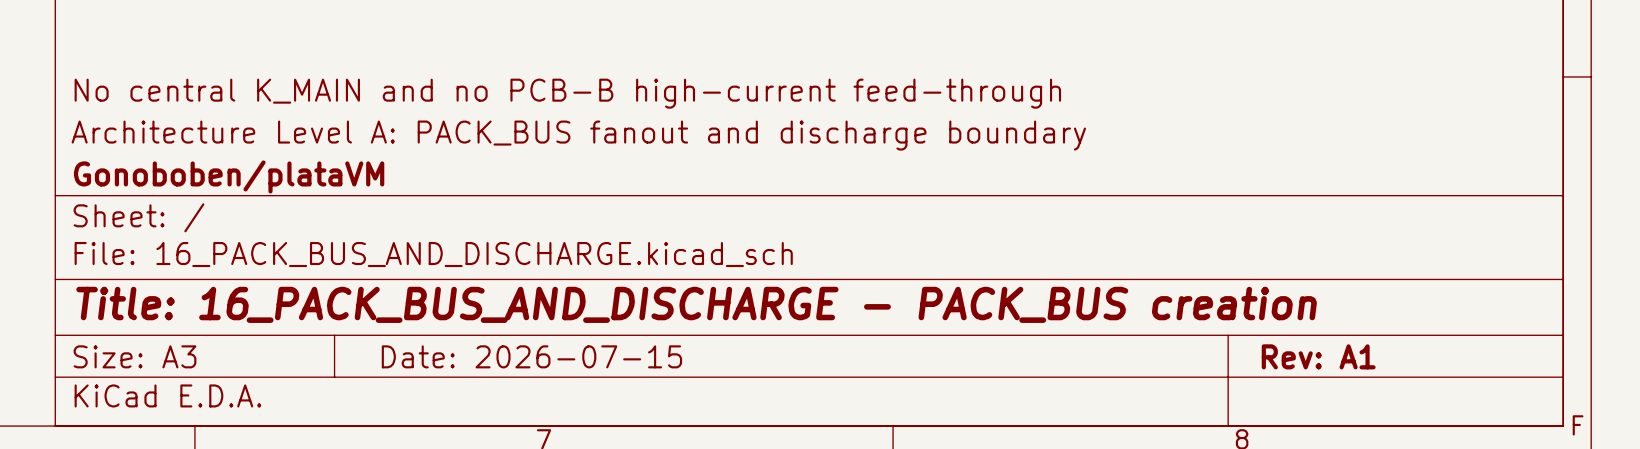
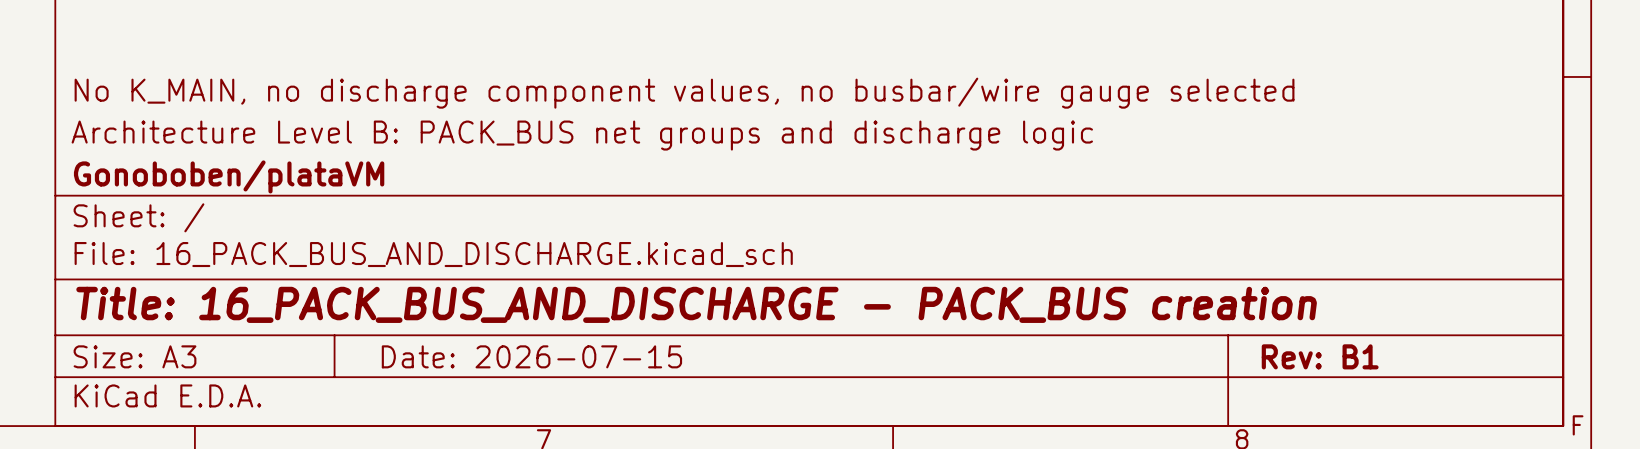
title block: No central K_MAIN and no PCB-B high-current feed-through (567, 93) -> No K_MAIN, no discharge component values, no busbar/wire gauge selected (684, 93)
title block: Architecture Level A: PACK_BUS fanout and discharge boundary (578, 135) -> Architecture Level B: PACK_BUS net groups and discharge logic (582, 135)
title block: Rev: A1 (1318, 356) -> Rev: B1 (1320, 356)

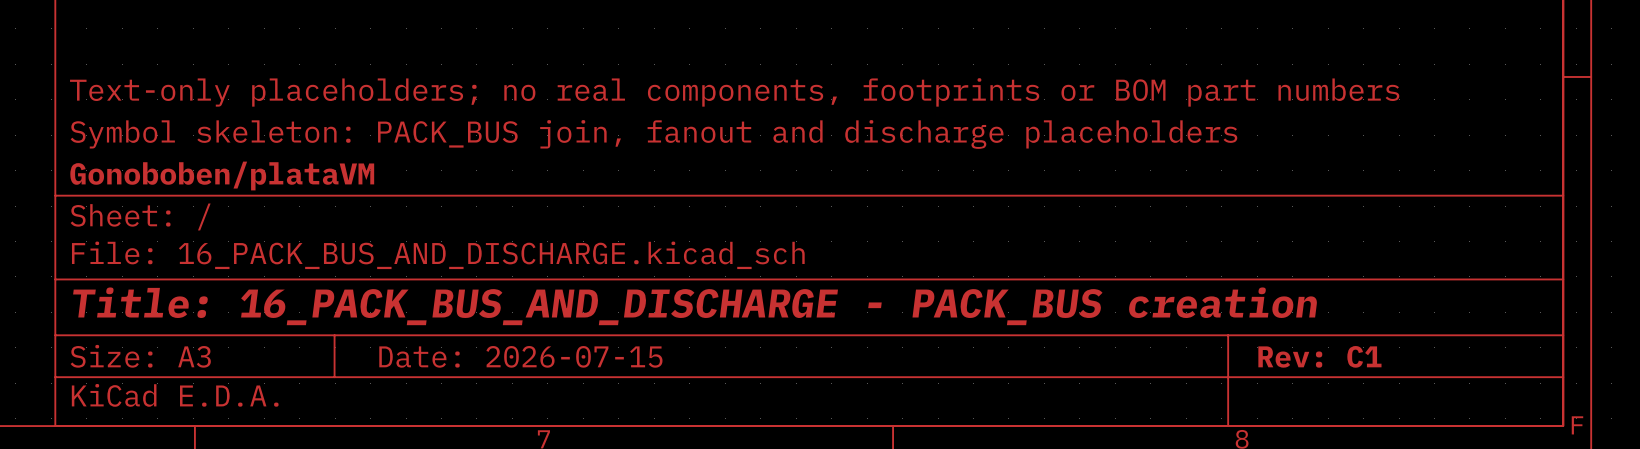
title block: No K_MAIN, no discharge component values, no busbar/wire gauge selected (684, 93) -> Text-only placeholders; no real components, footprints or BOM part numbers (734, 92)
title block: Architecture Level B: PACK_BUS net groups and discharge logic (582, 135) -> Symbol skeleton: PACK_BUS join, fanout and discharge placeholders (653, 134)
title block: Rev: B1 (1320, 356) -> Rev: C1 (1319, 356)

